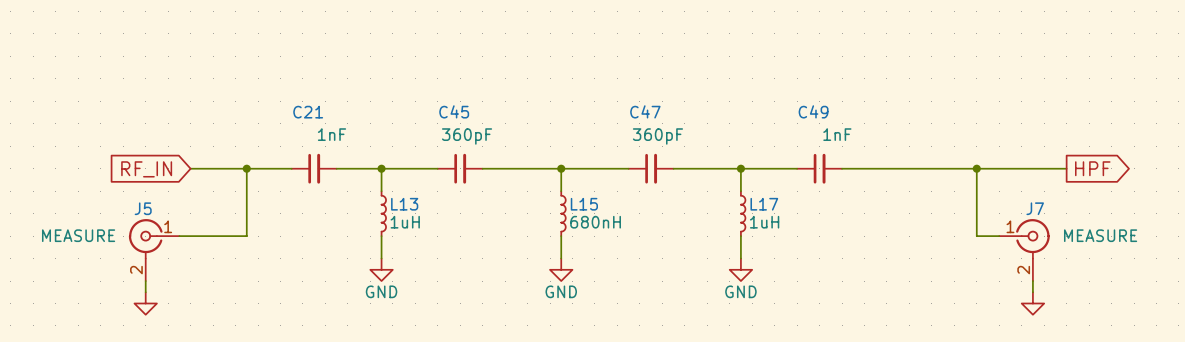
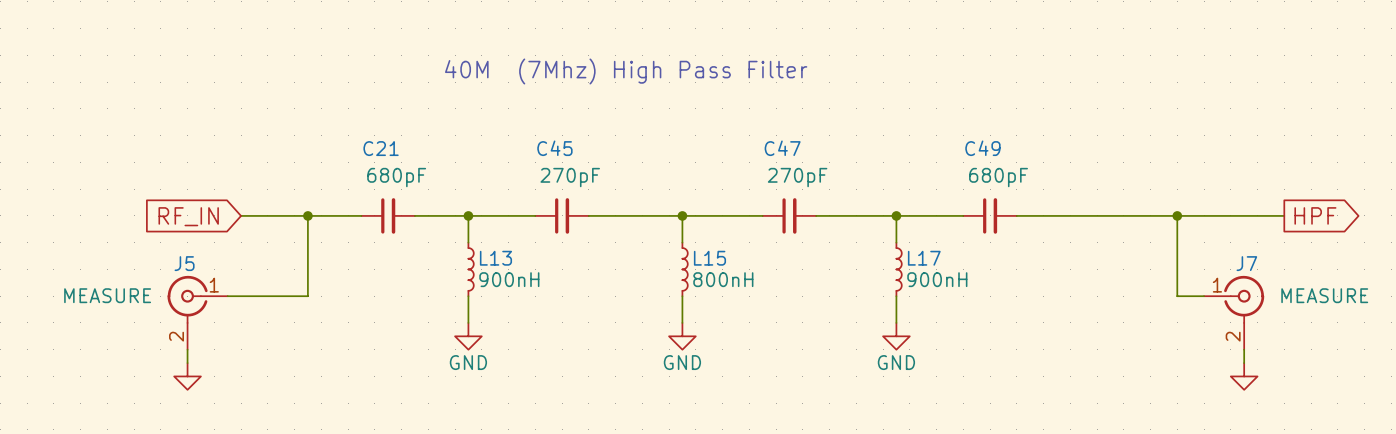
text: none -> 40M (7Mhz) High Pass Filter (626, 71)
C21 value: 1nF (331, 134) -> 680pF (396, 177)
C49 value: 1nF (837, 134) -> 680pF (998, 177)
C45 value: 360pF (467, 136) -> 270pF (570, 177)
C47 value: 360pF (657, 136) -> 270pF (797, 177)
L13 value: 1uH (405, 222) -> 900nH (509, 279)
L15 value: 680nH (595, 222) -> 800nH (723, 279)
L17 value: 1uH (764, 222) -> 900nH (937, 279)

